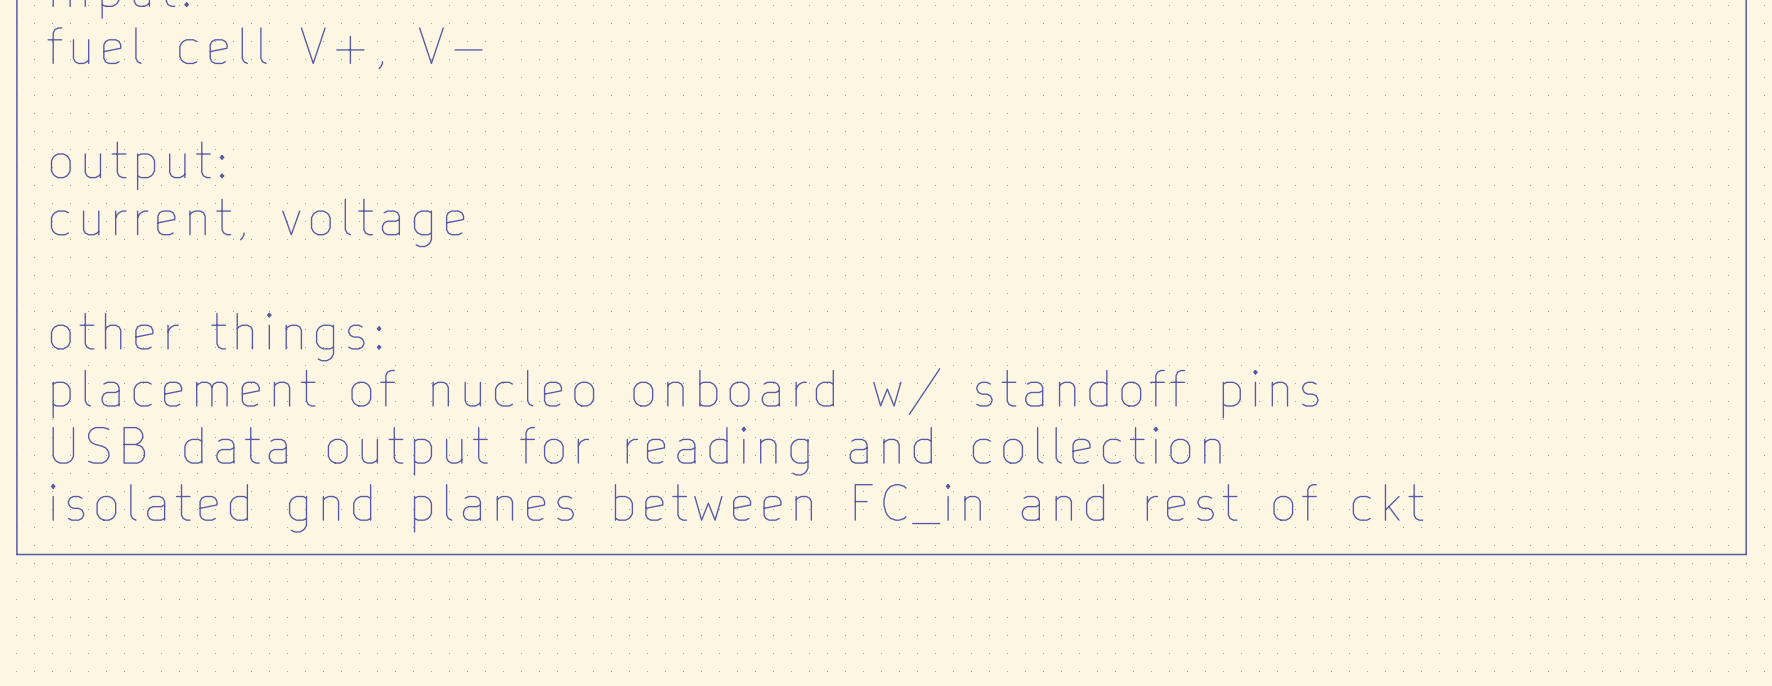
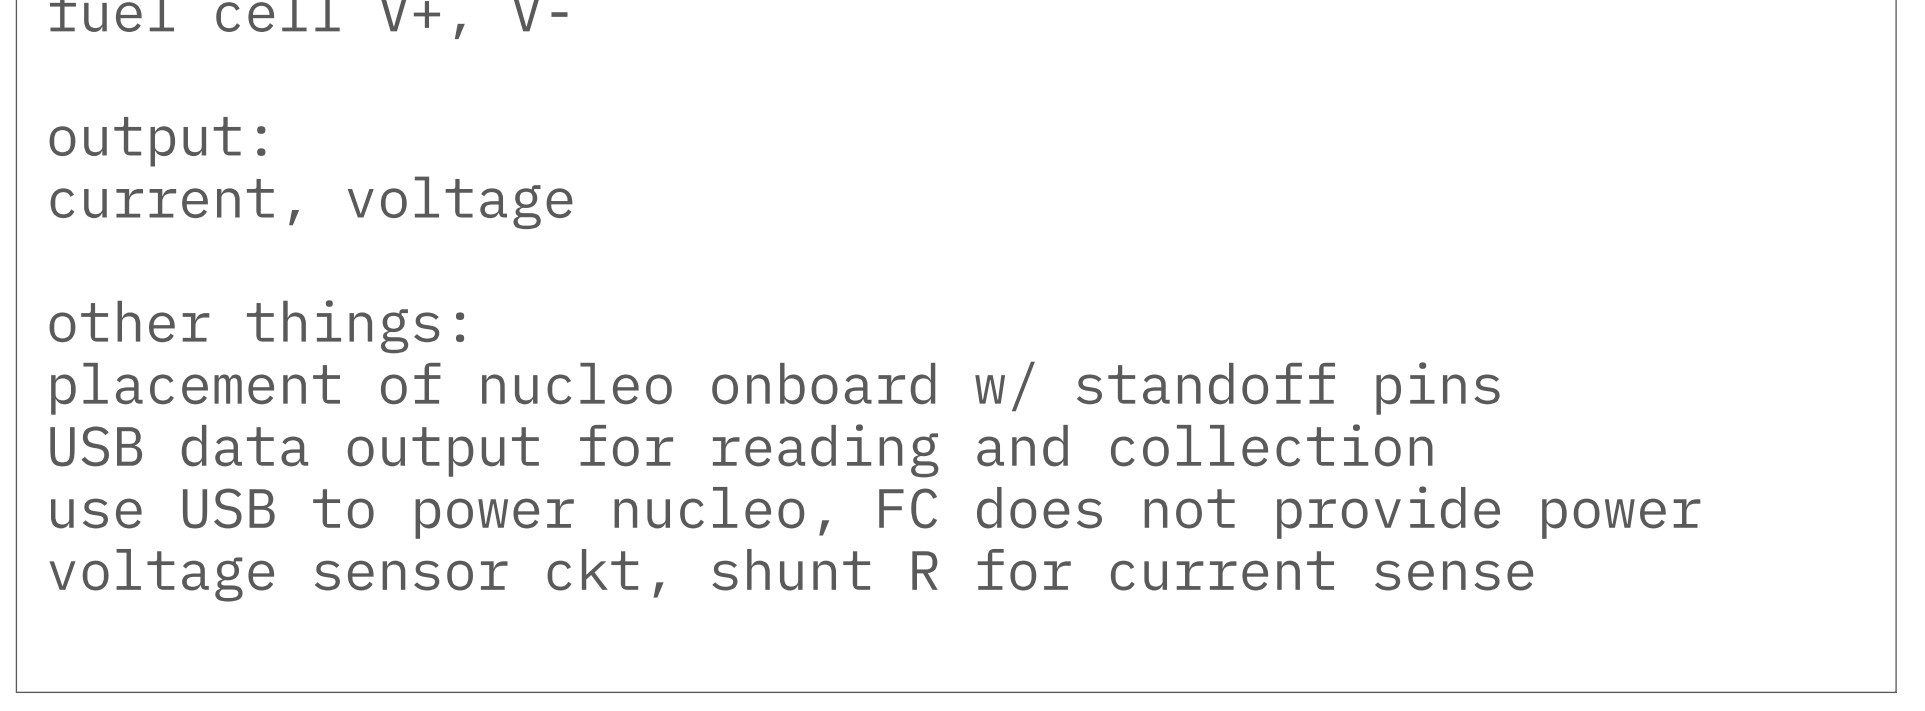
text: isolated gnd planes between FC_in and rest of ckt (737, 508) -> use USB to power nucleo, FC does not provide power (875, 512)
line: (16, 554) (1746, 554) -> (16, 565) (16, 692) (1896, 692) (1896, 565)
text: none -> voltage sensor ckt, shunt R for current sense (791, 575)

